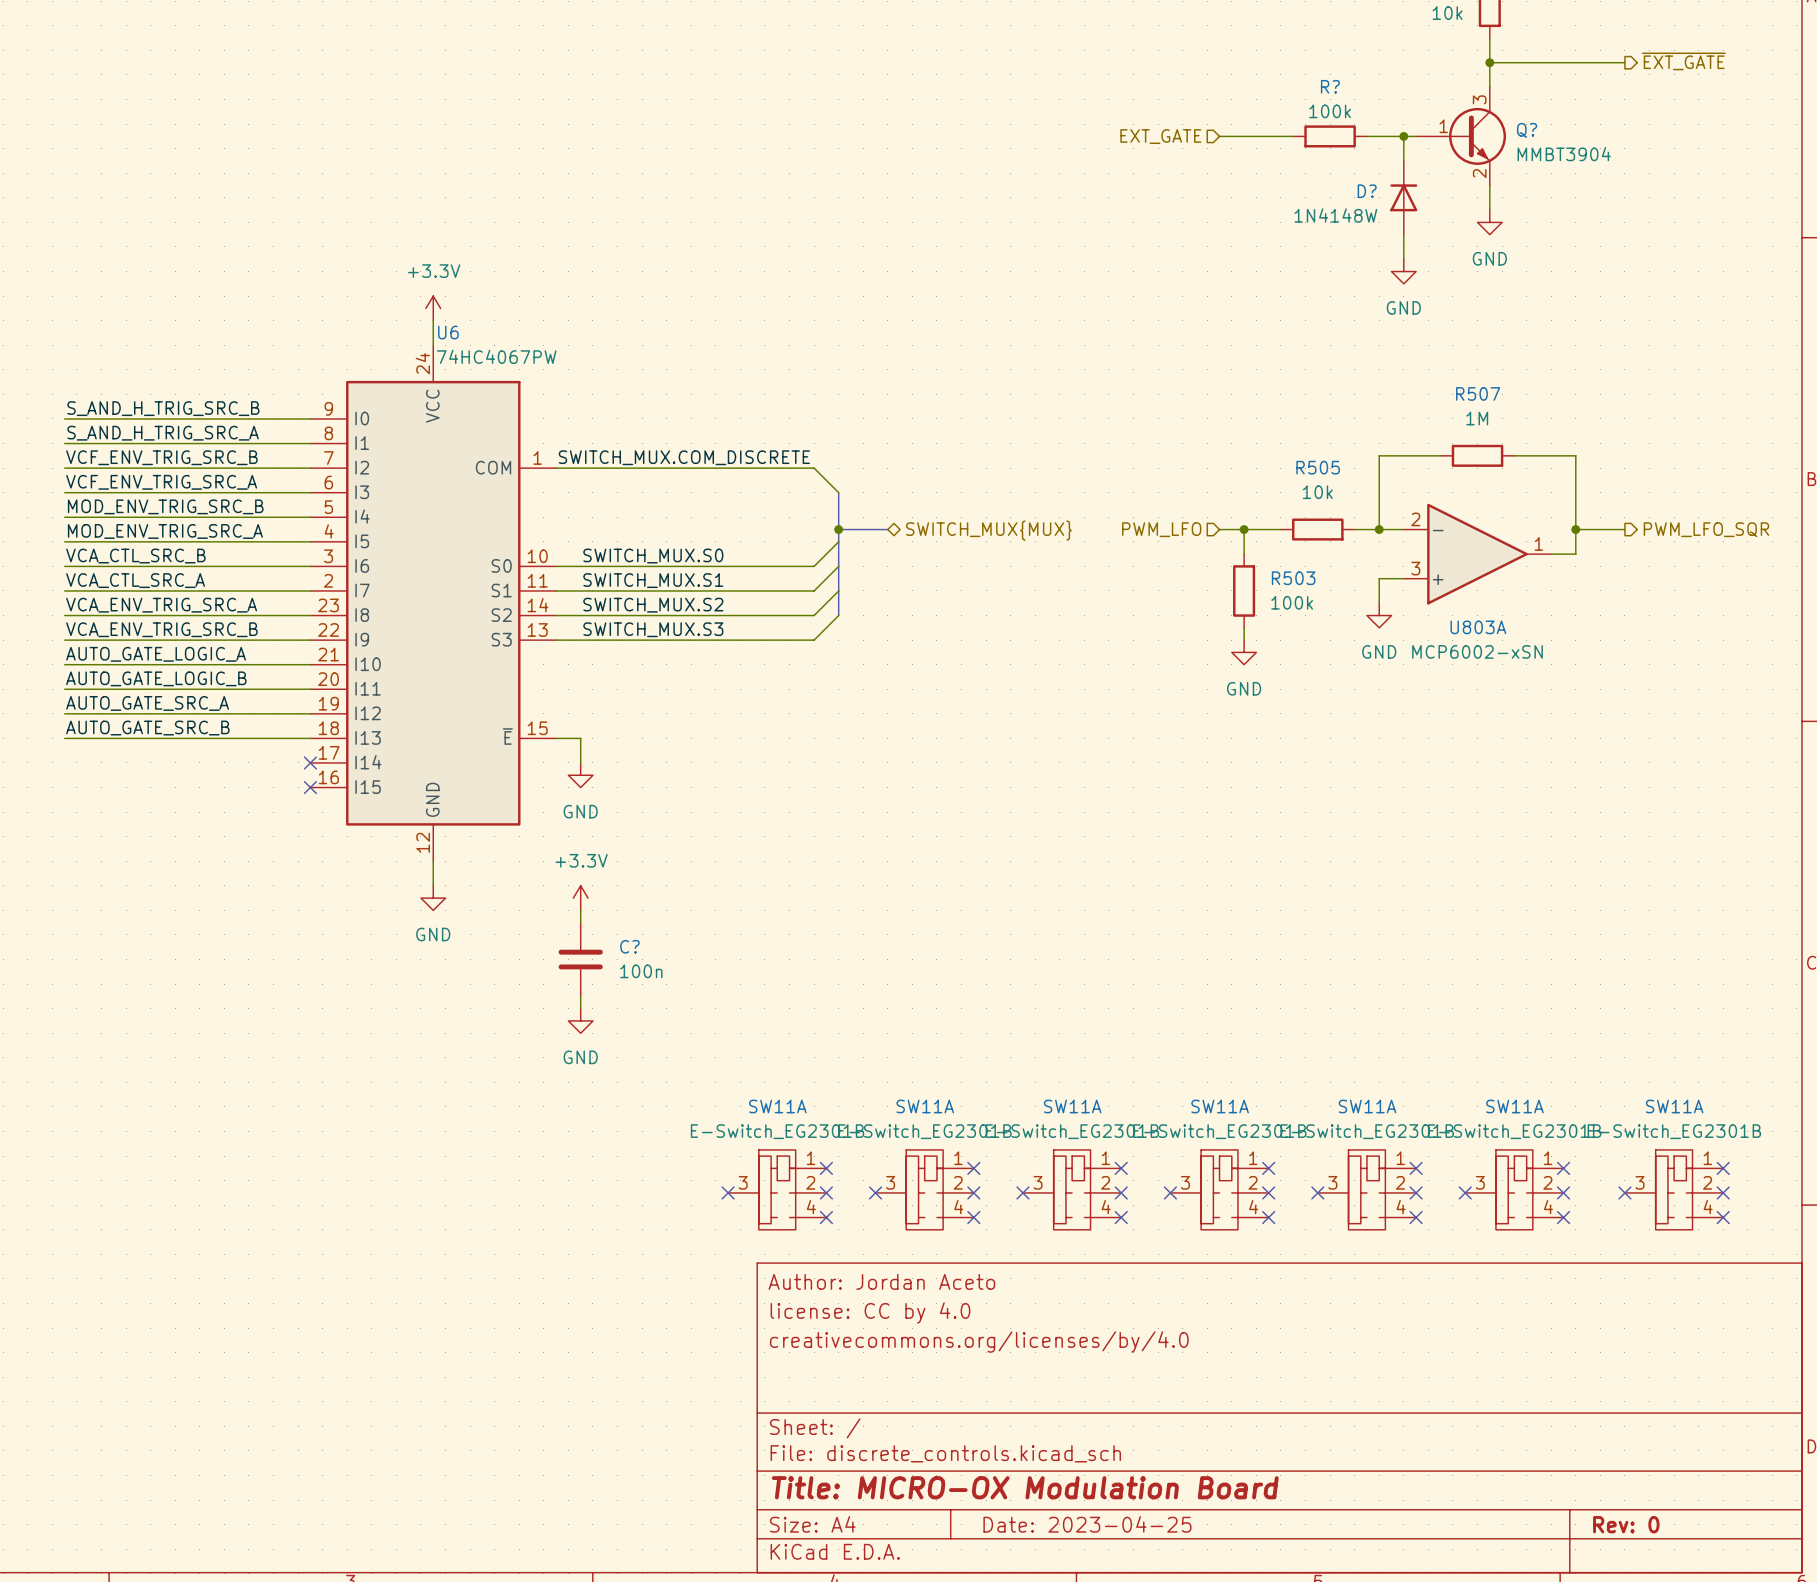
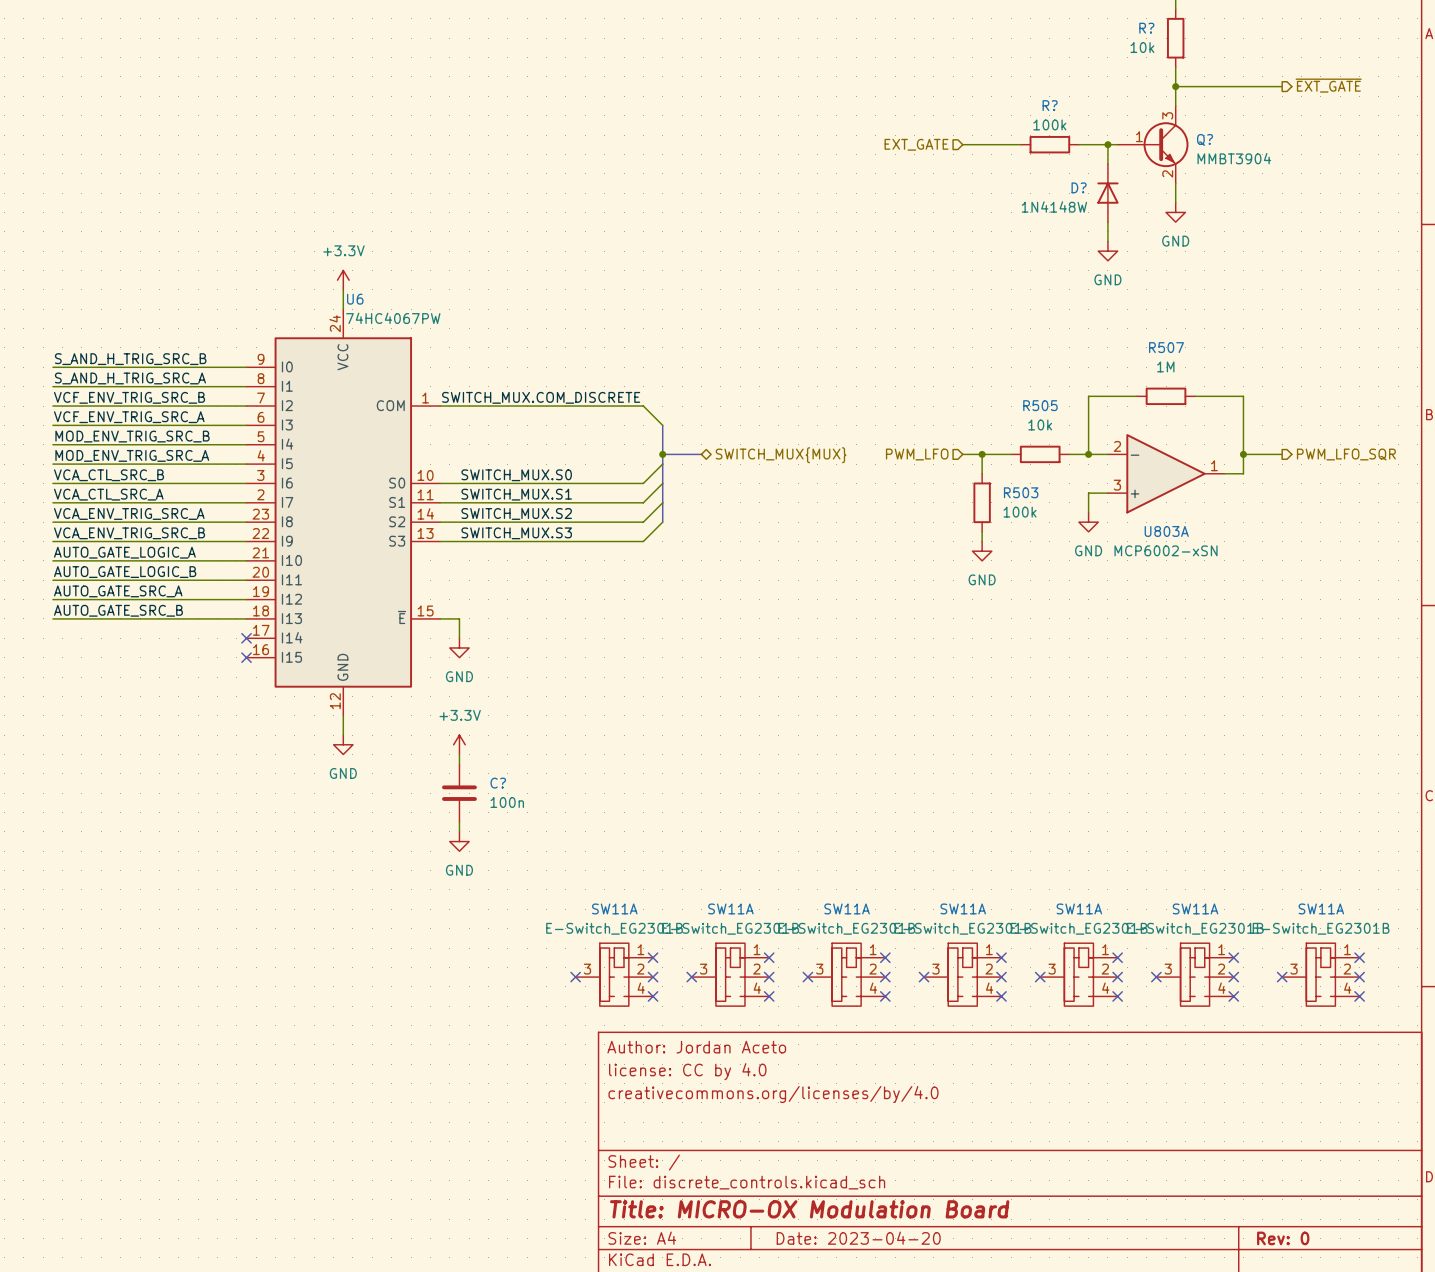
title block: Date: 2023-04-25 (1087, 1524) -> Date: 2023-04-20 (858, 1238)

